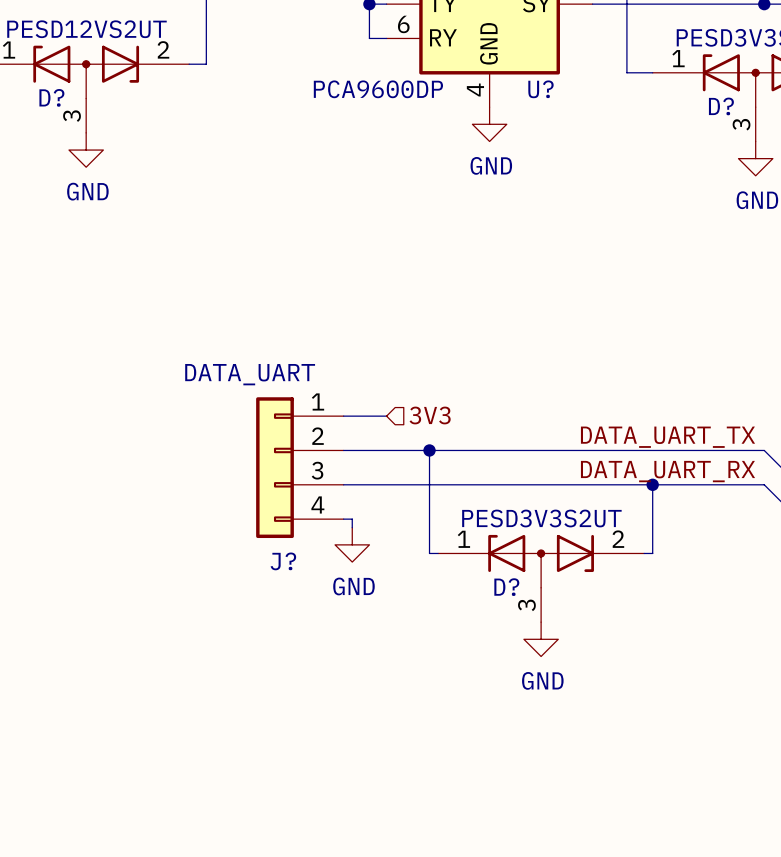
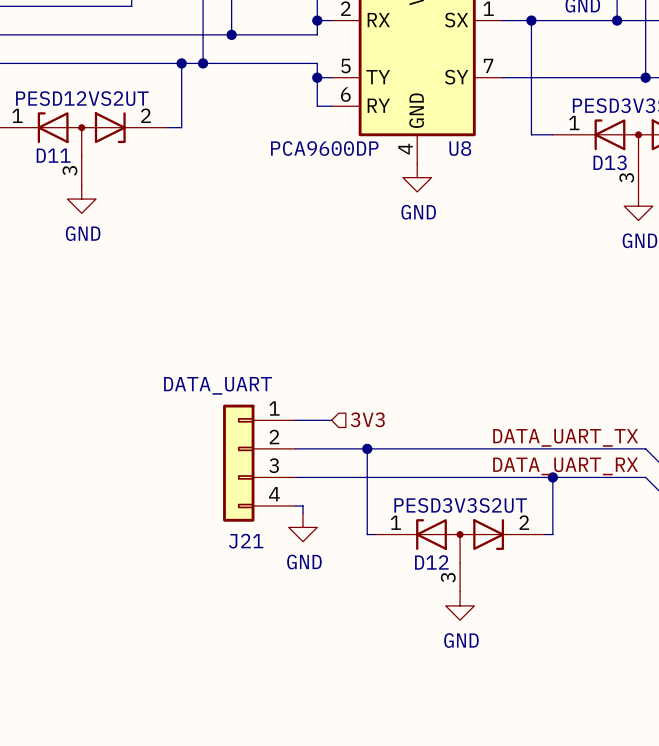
U? name: U? (540, 89) -> U8 (460, 148)
D? name: D? (51, 97) -> D11 (53, 155)
D? name: D? (721, 106) -> D13 (610, 162)
J? name: J? (283, 561) -> J21 (246, 541)
D? name: D? (506, 587) -> D12 (431, 562)

